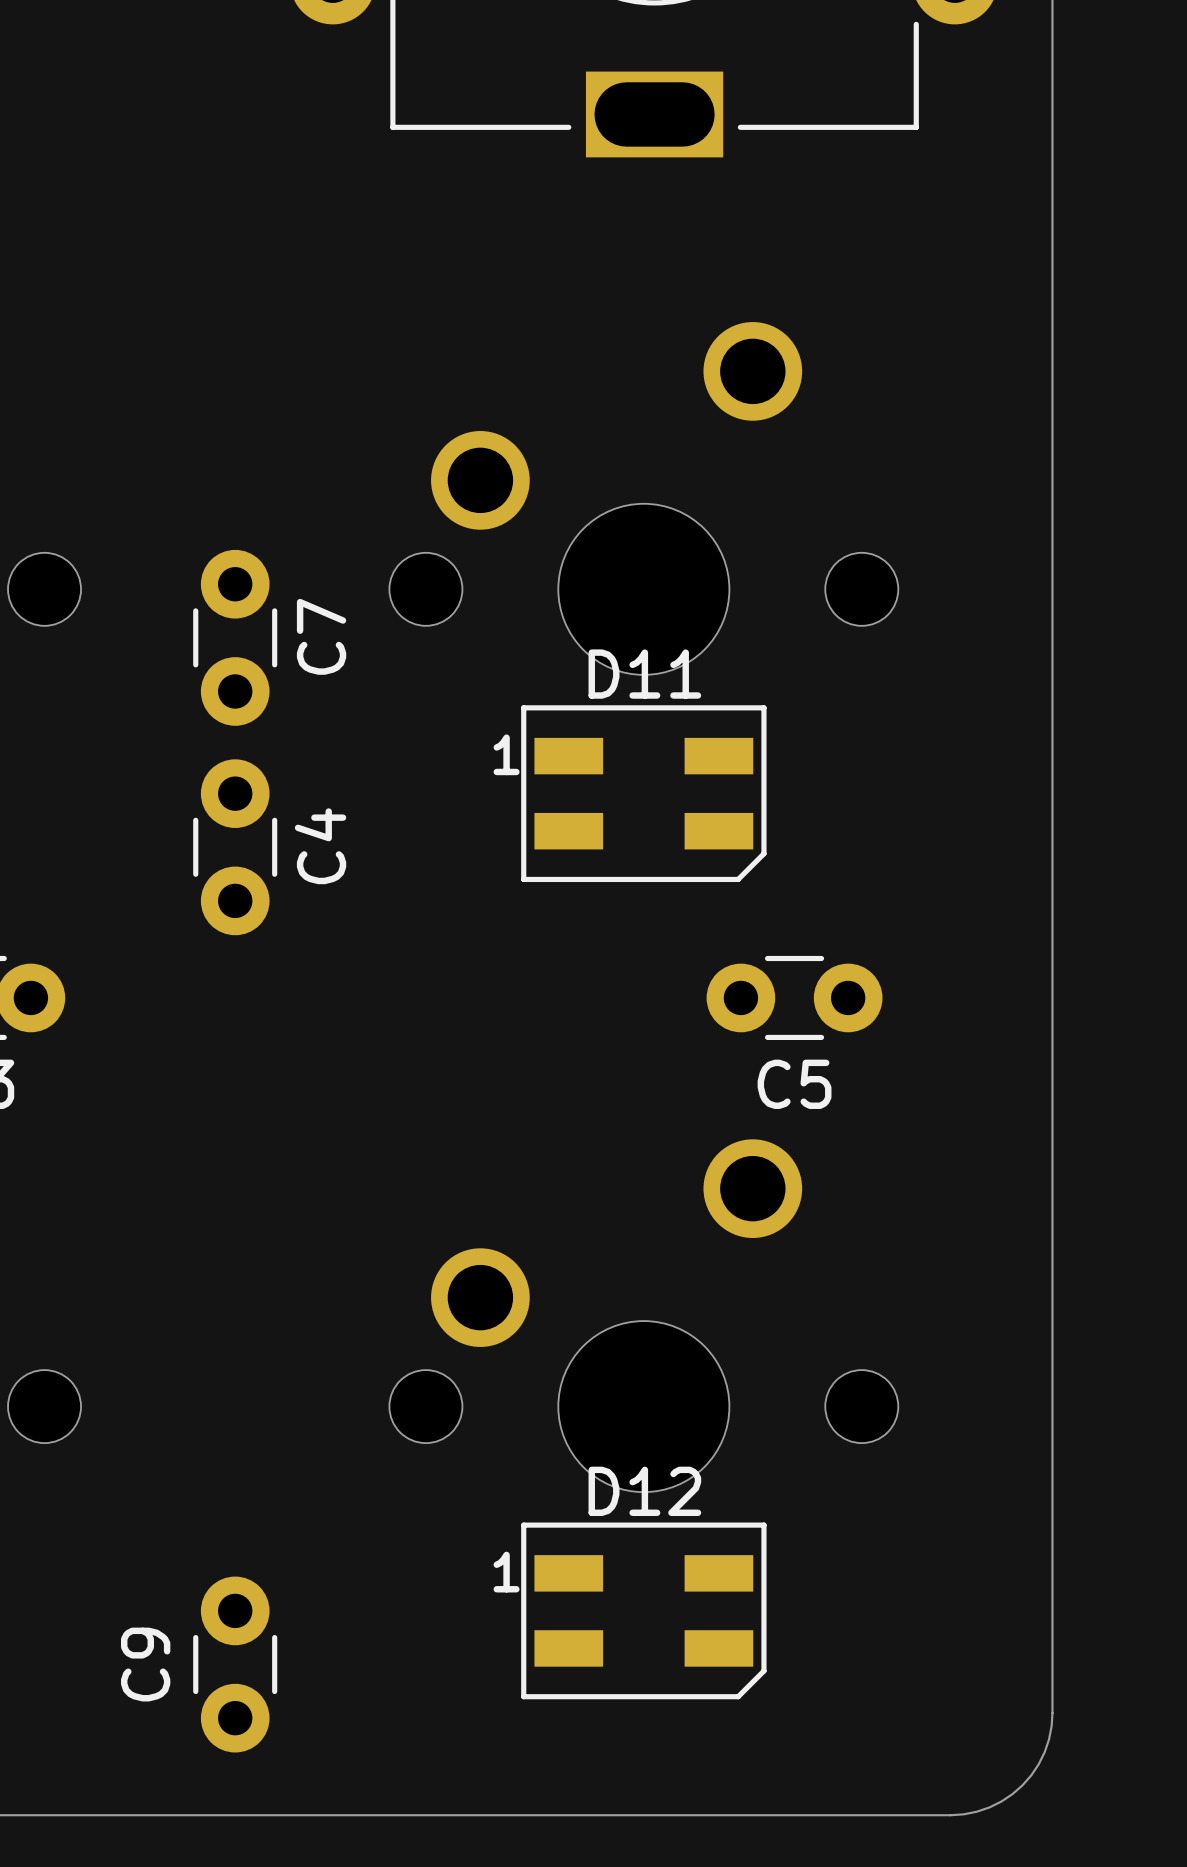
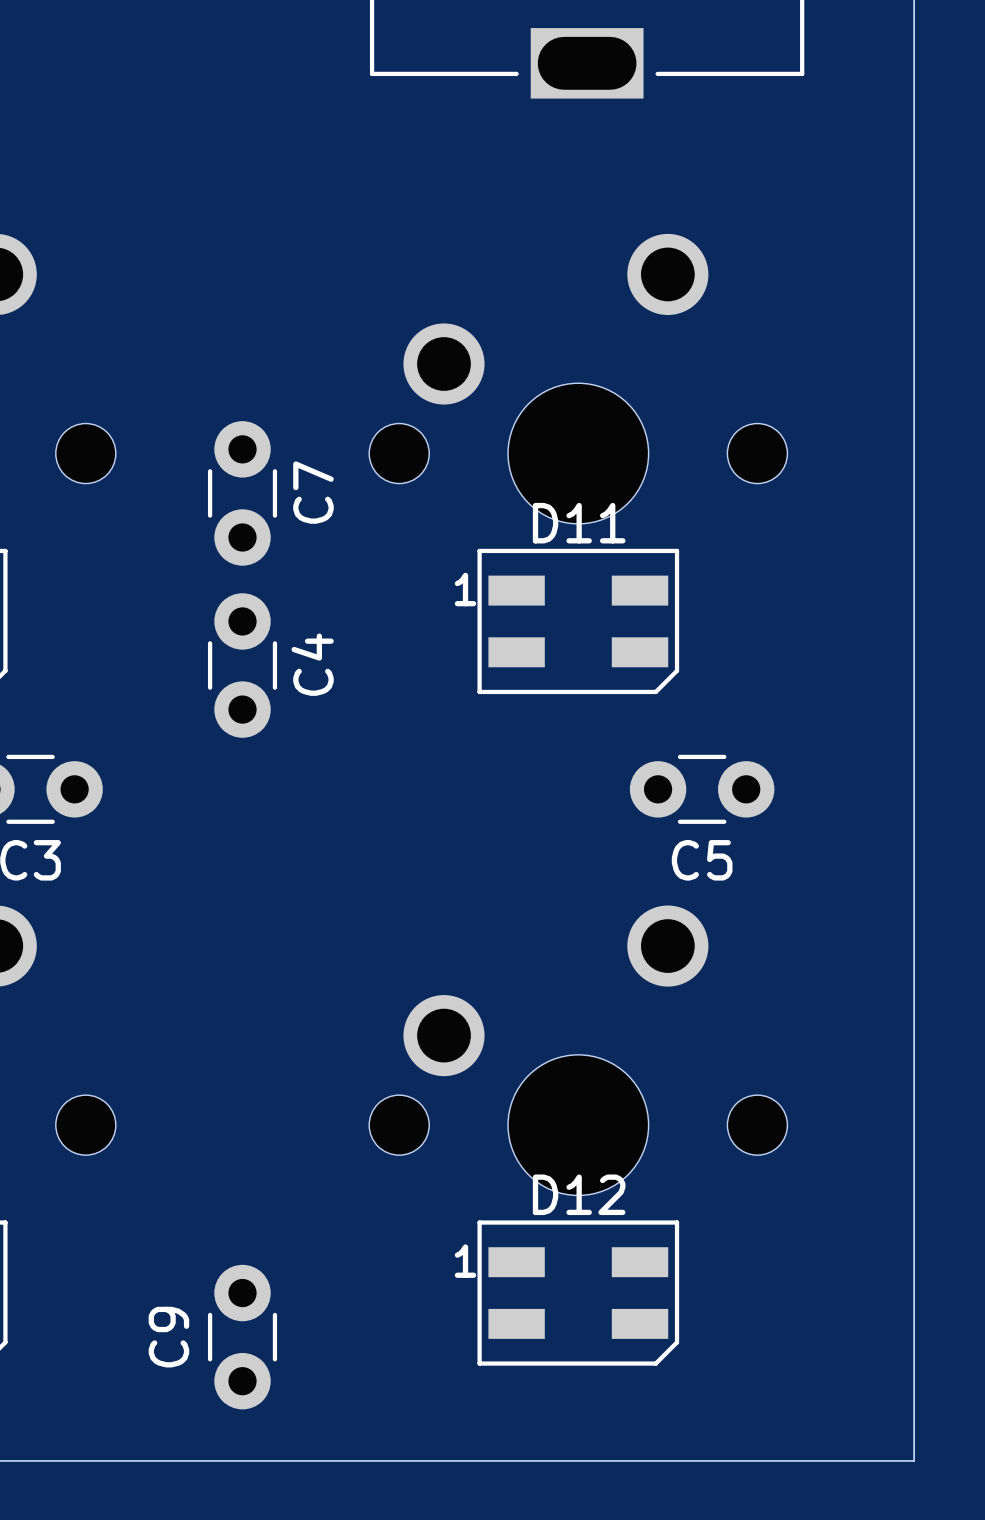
board edge: (1052, 1713) (1051, 1726) (1044, 1752) (1031, 1775) (1022, 1785) (1001, 1801) (989, 1807) (976, 1811) (950, 1815) -> (914, 1376) (914, 1460) (830, 1460)

